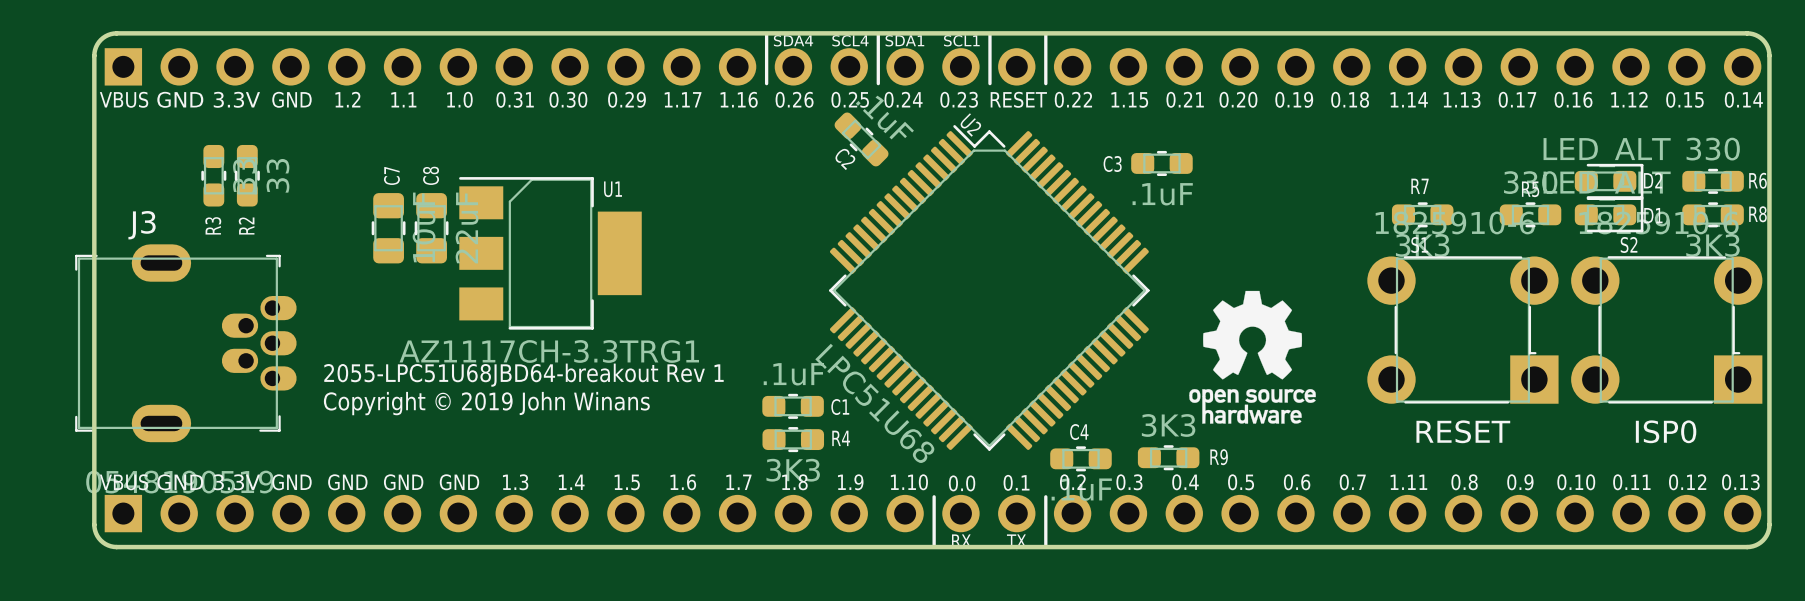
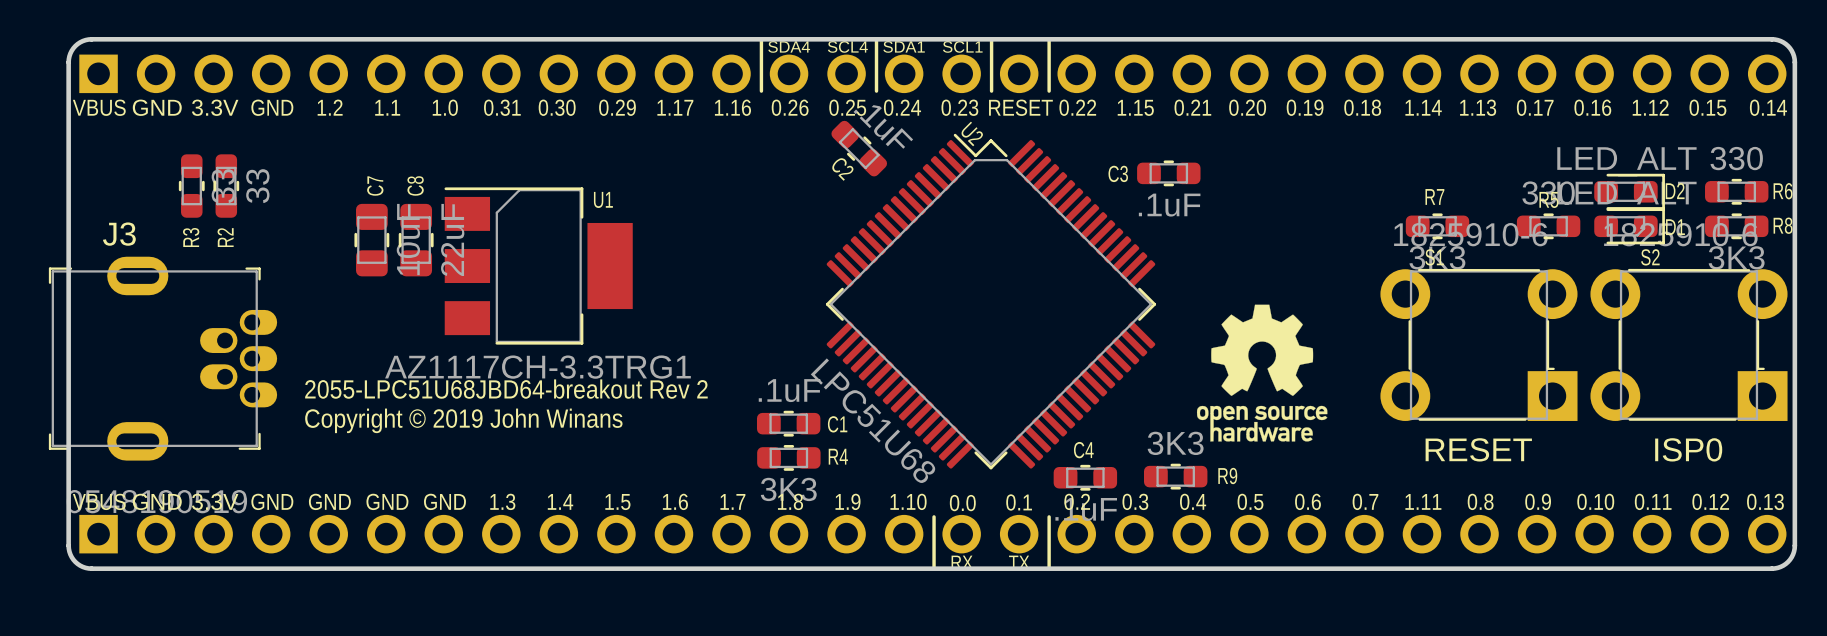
text: 2055-LPC51U68JBD64-breakout Rev 1 (523, 375) -> 2055-LPC51U68JBD64-breakout Rev 2 (506, 389)

